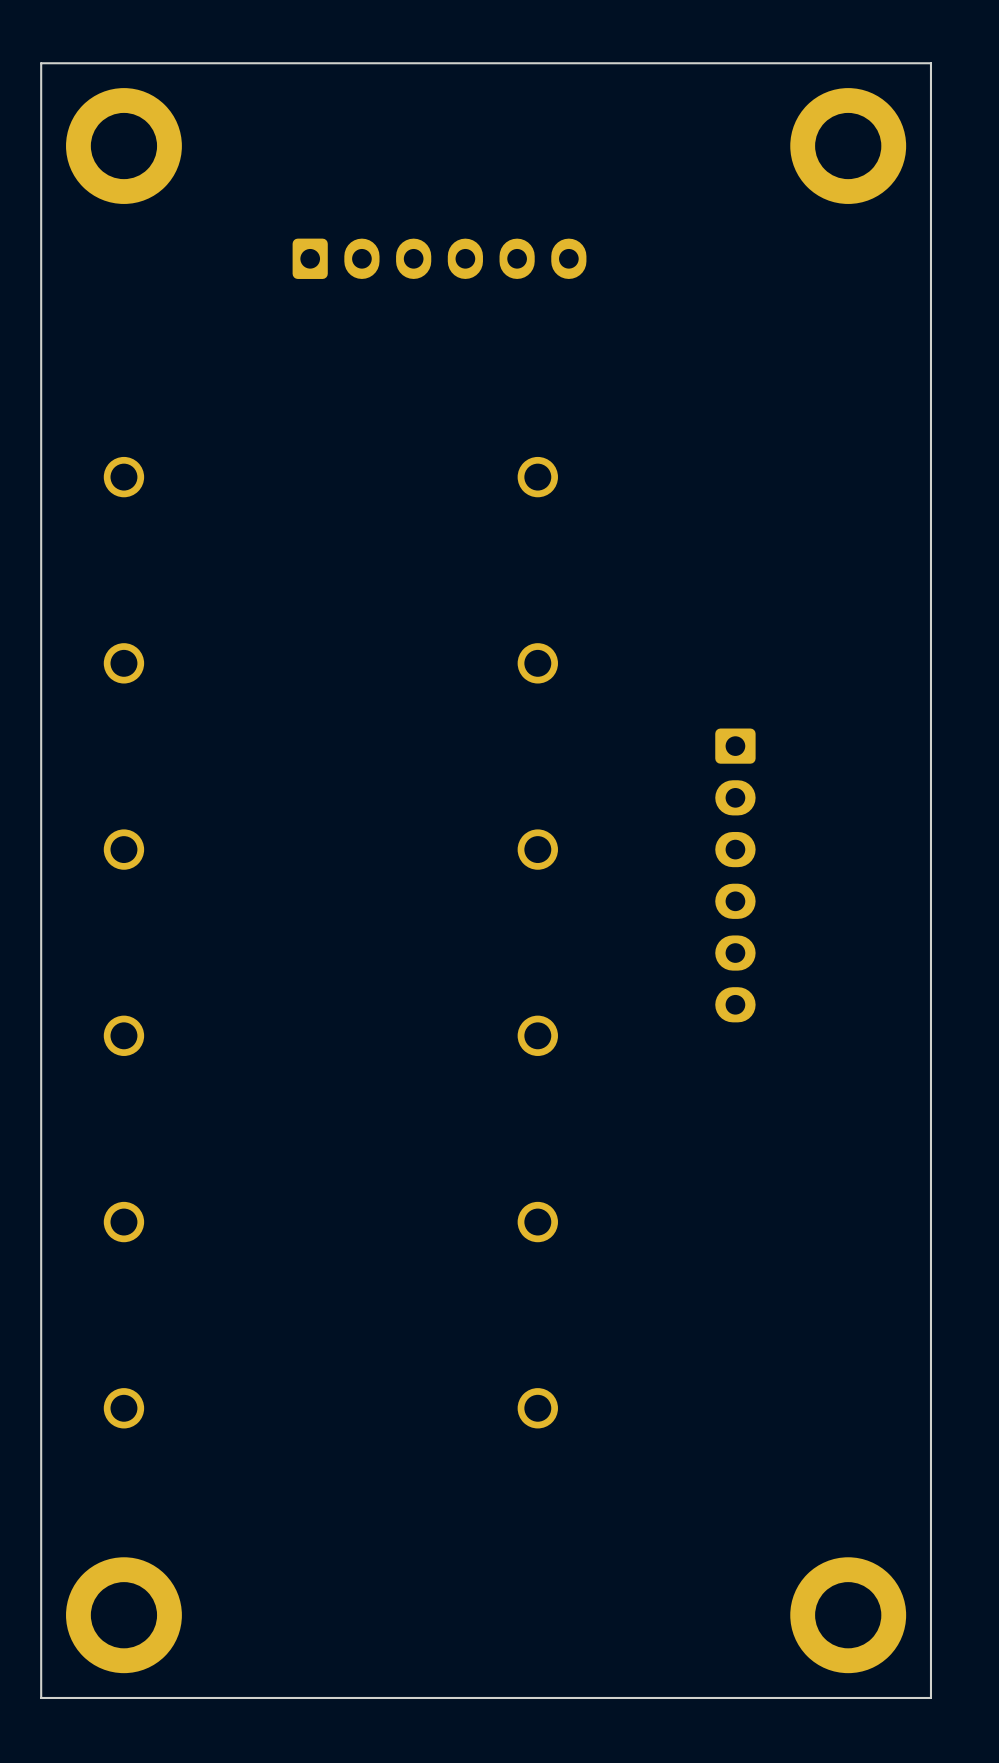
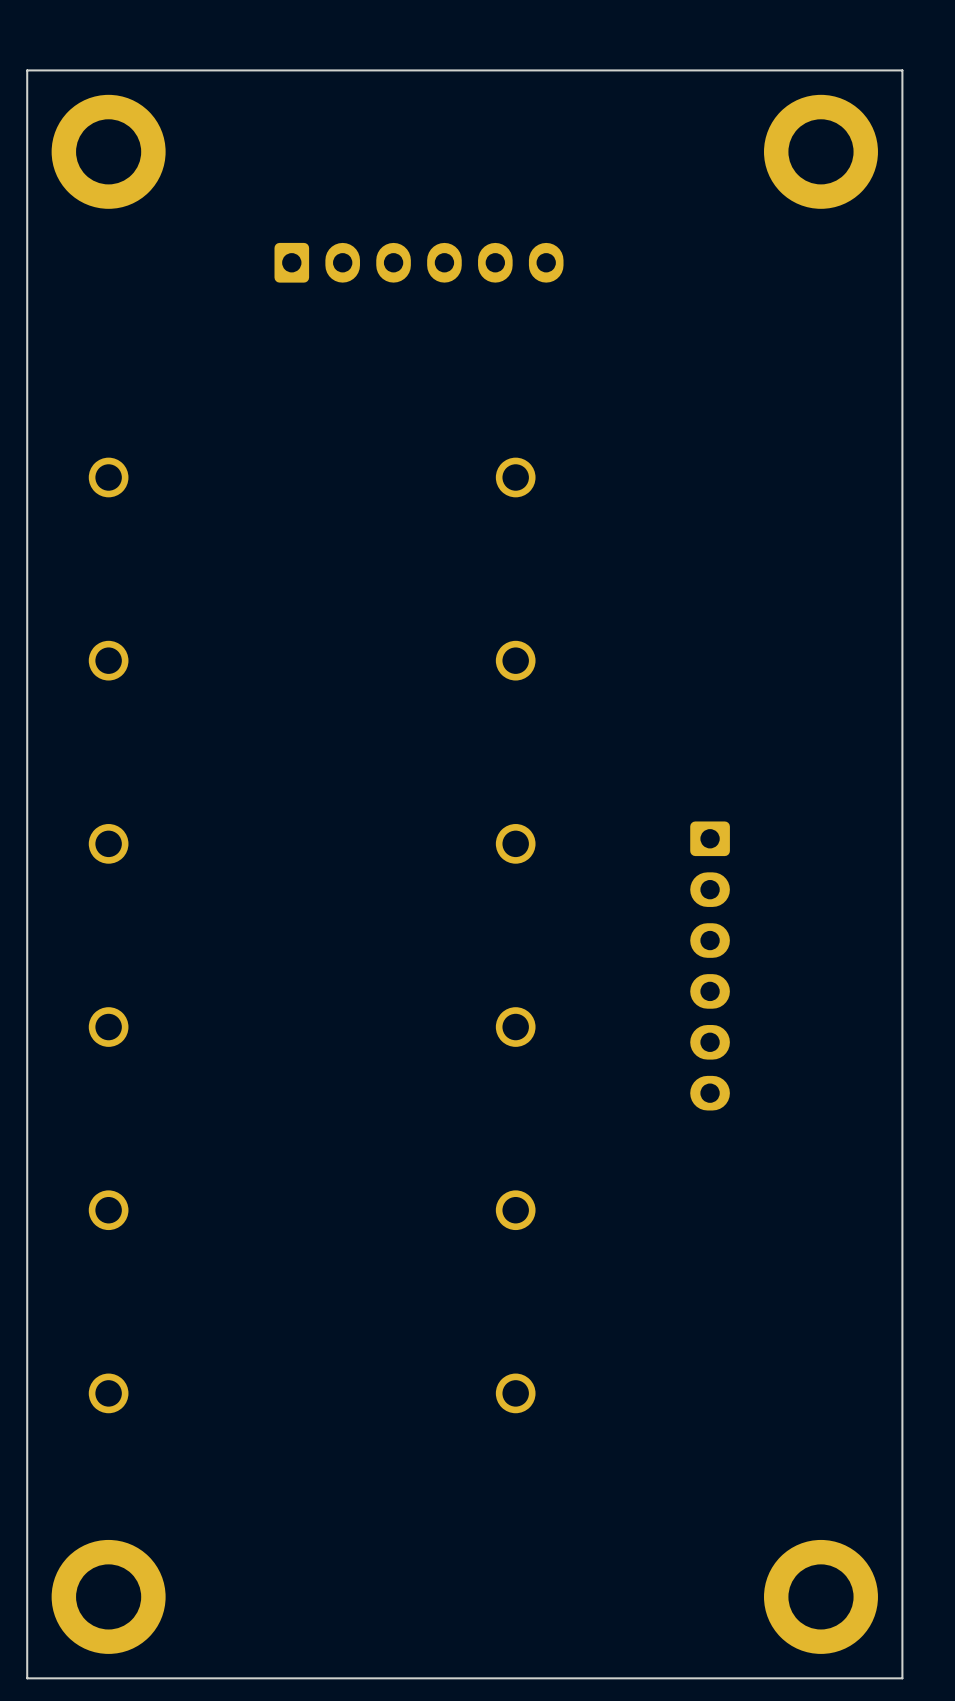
part position: (735, 875) -> (710, 965)

